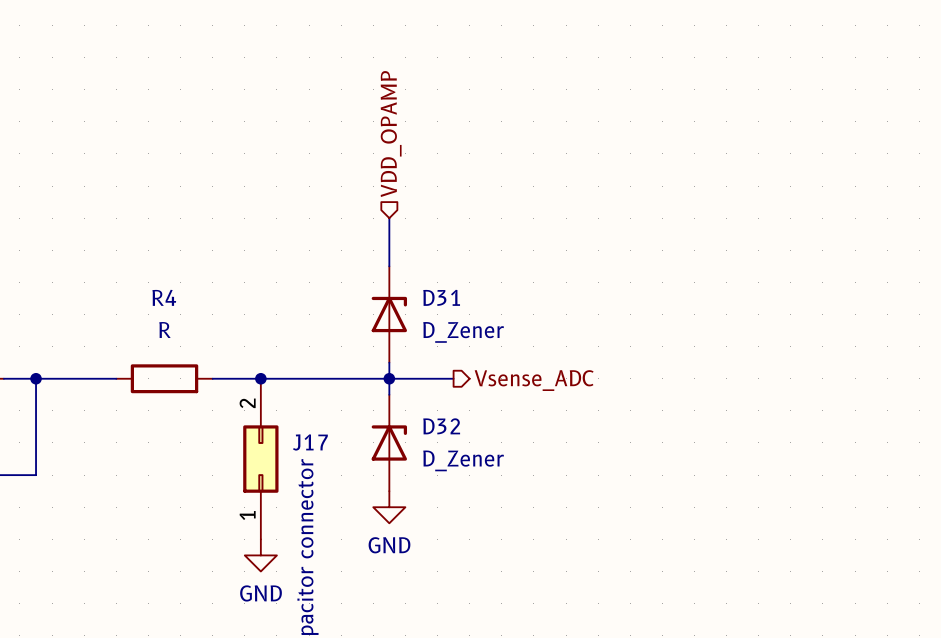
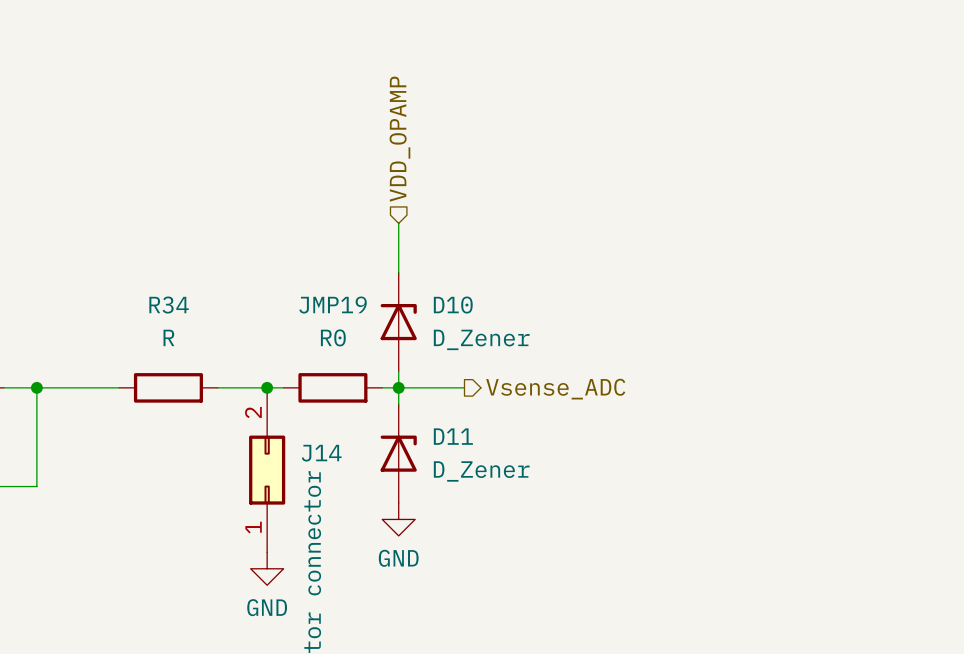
R4 name: R4 (164, 297) -> R34 (169, 305)
D31 name: D31 (441, 297) -> D10 (453, 305)
wire: (276, 378) (373, 378) -> none
JMP19: none -> R0 (332, 387)
D32 name: D32 (441, 426) -> D11 (453, 436)
J17 name: J17 (310, 442) -> J14 (321, 453)

